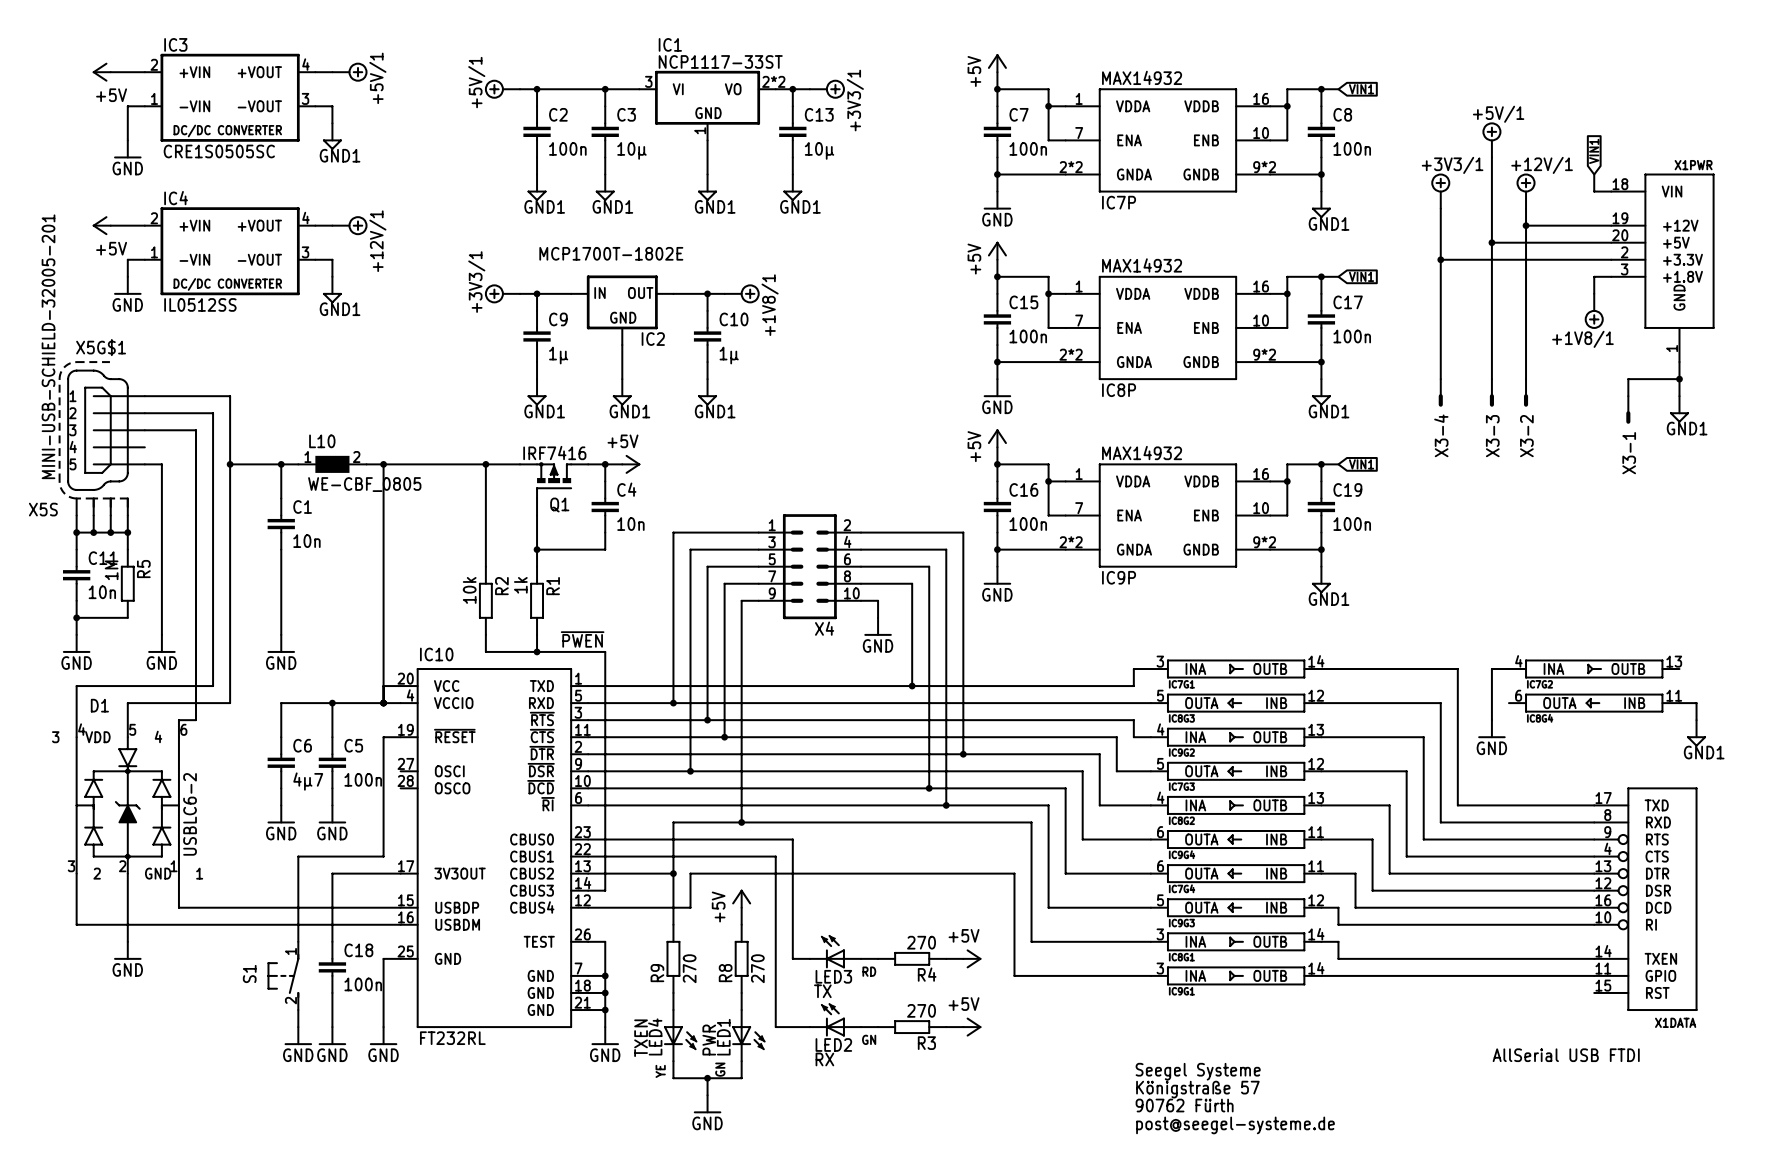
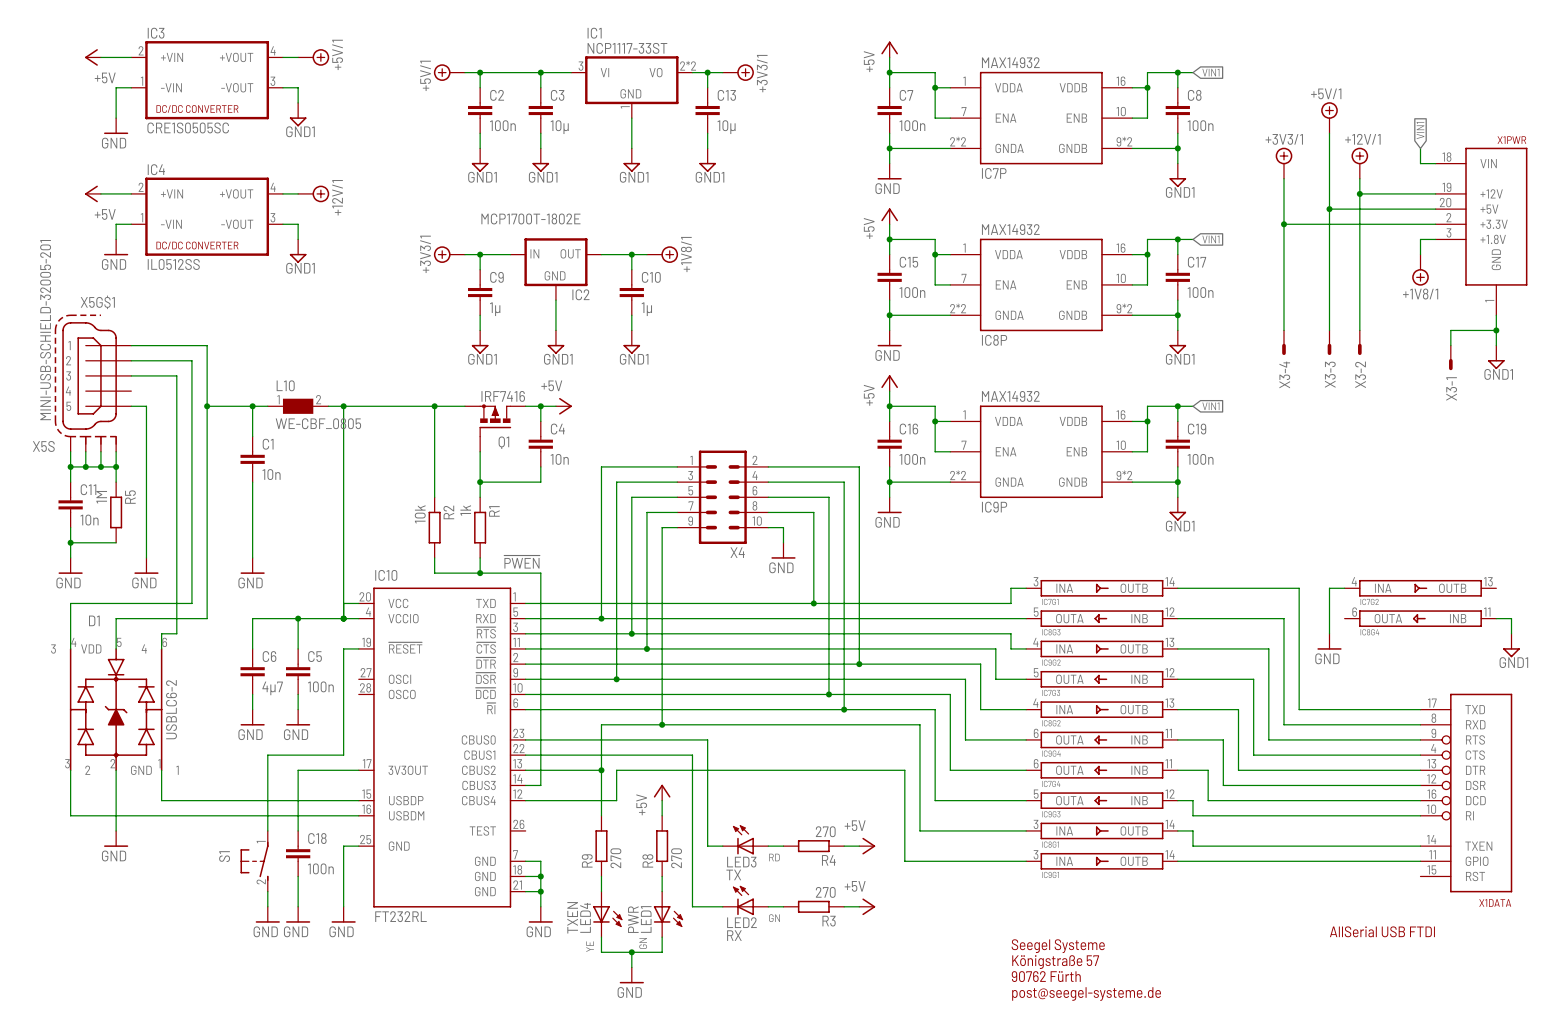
wire: (588, 941) (605, 941) (605, 975) -> none
junction: (605, 975) -> none

